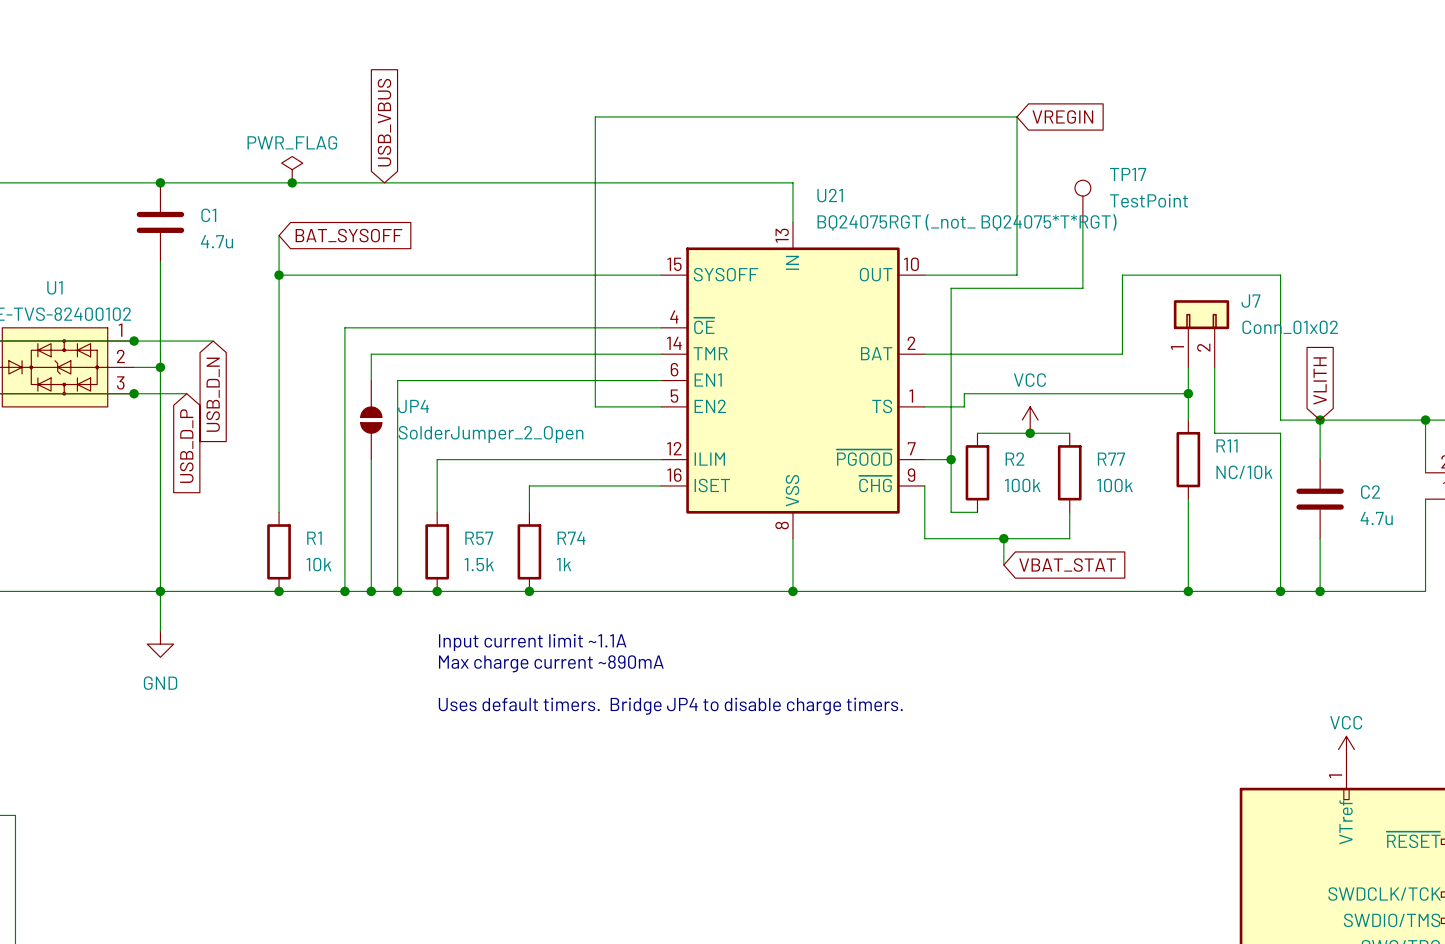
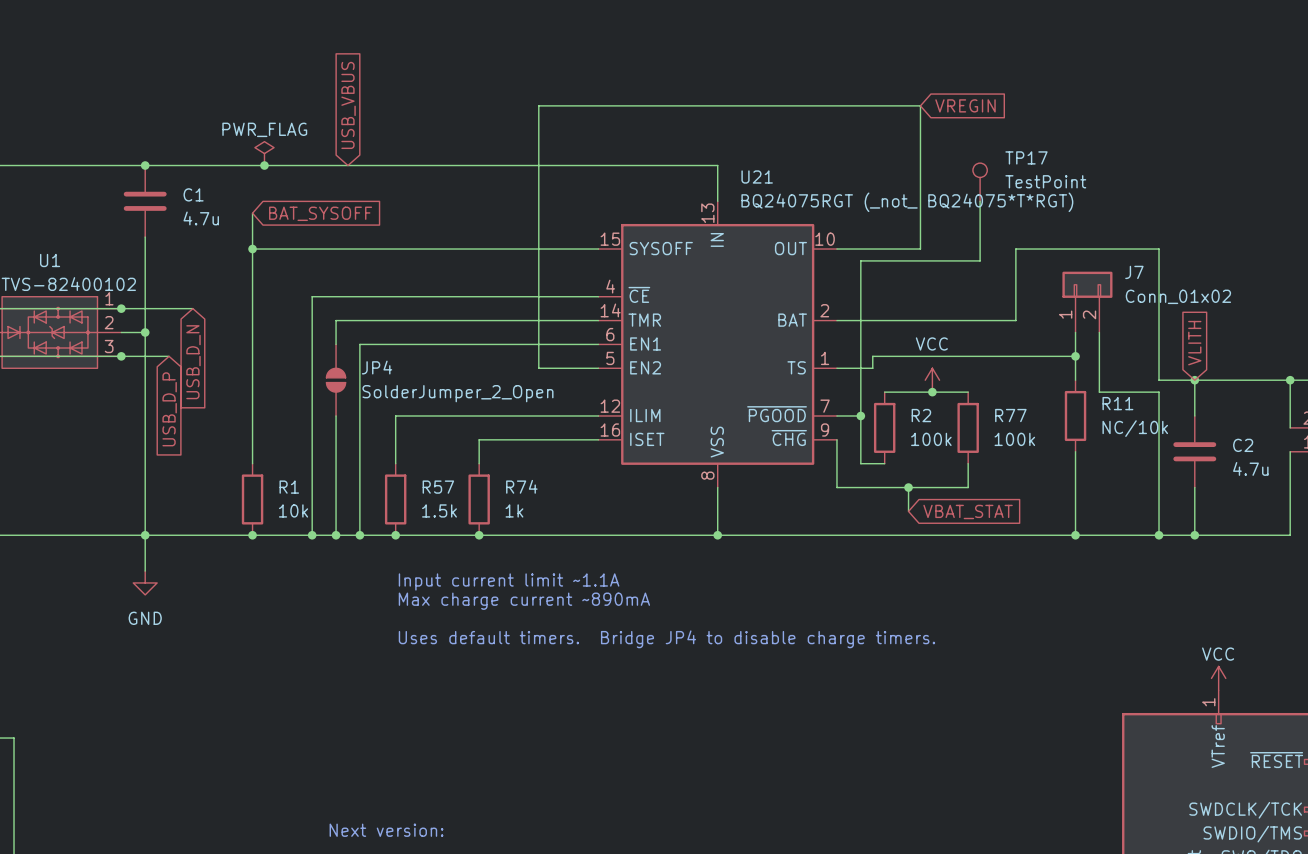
text: none -> Next version: (386, 830)

